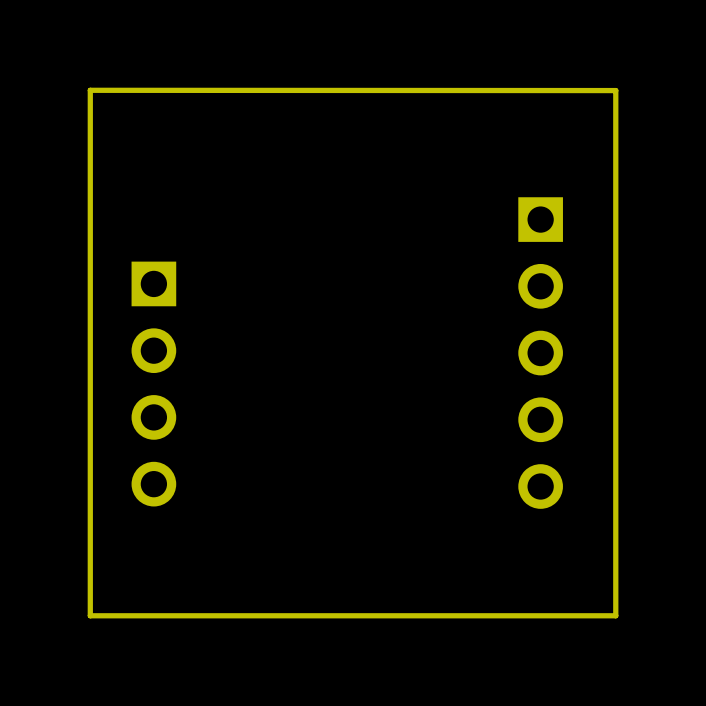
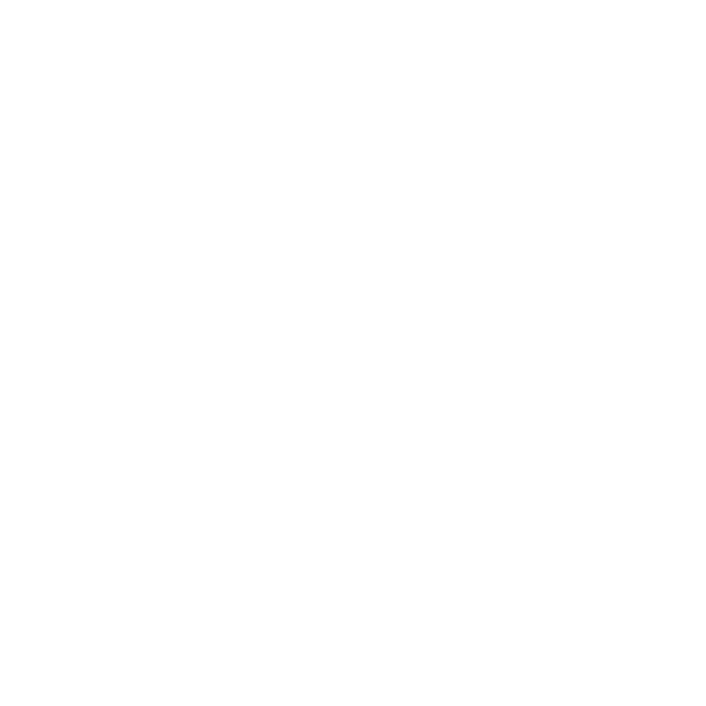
board edge: (90, 90) (615, 90) (615, 615) (90, 615) (90, 90) -> none
part: (540, 353) -> none
part: (153, 384) -> none

